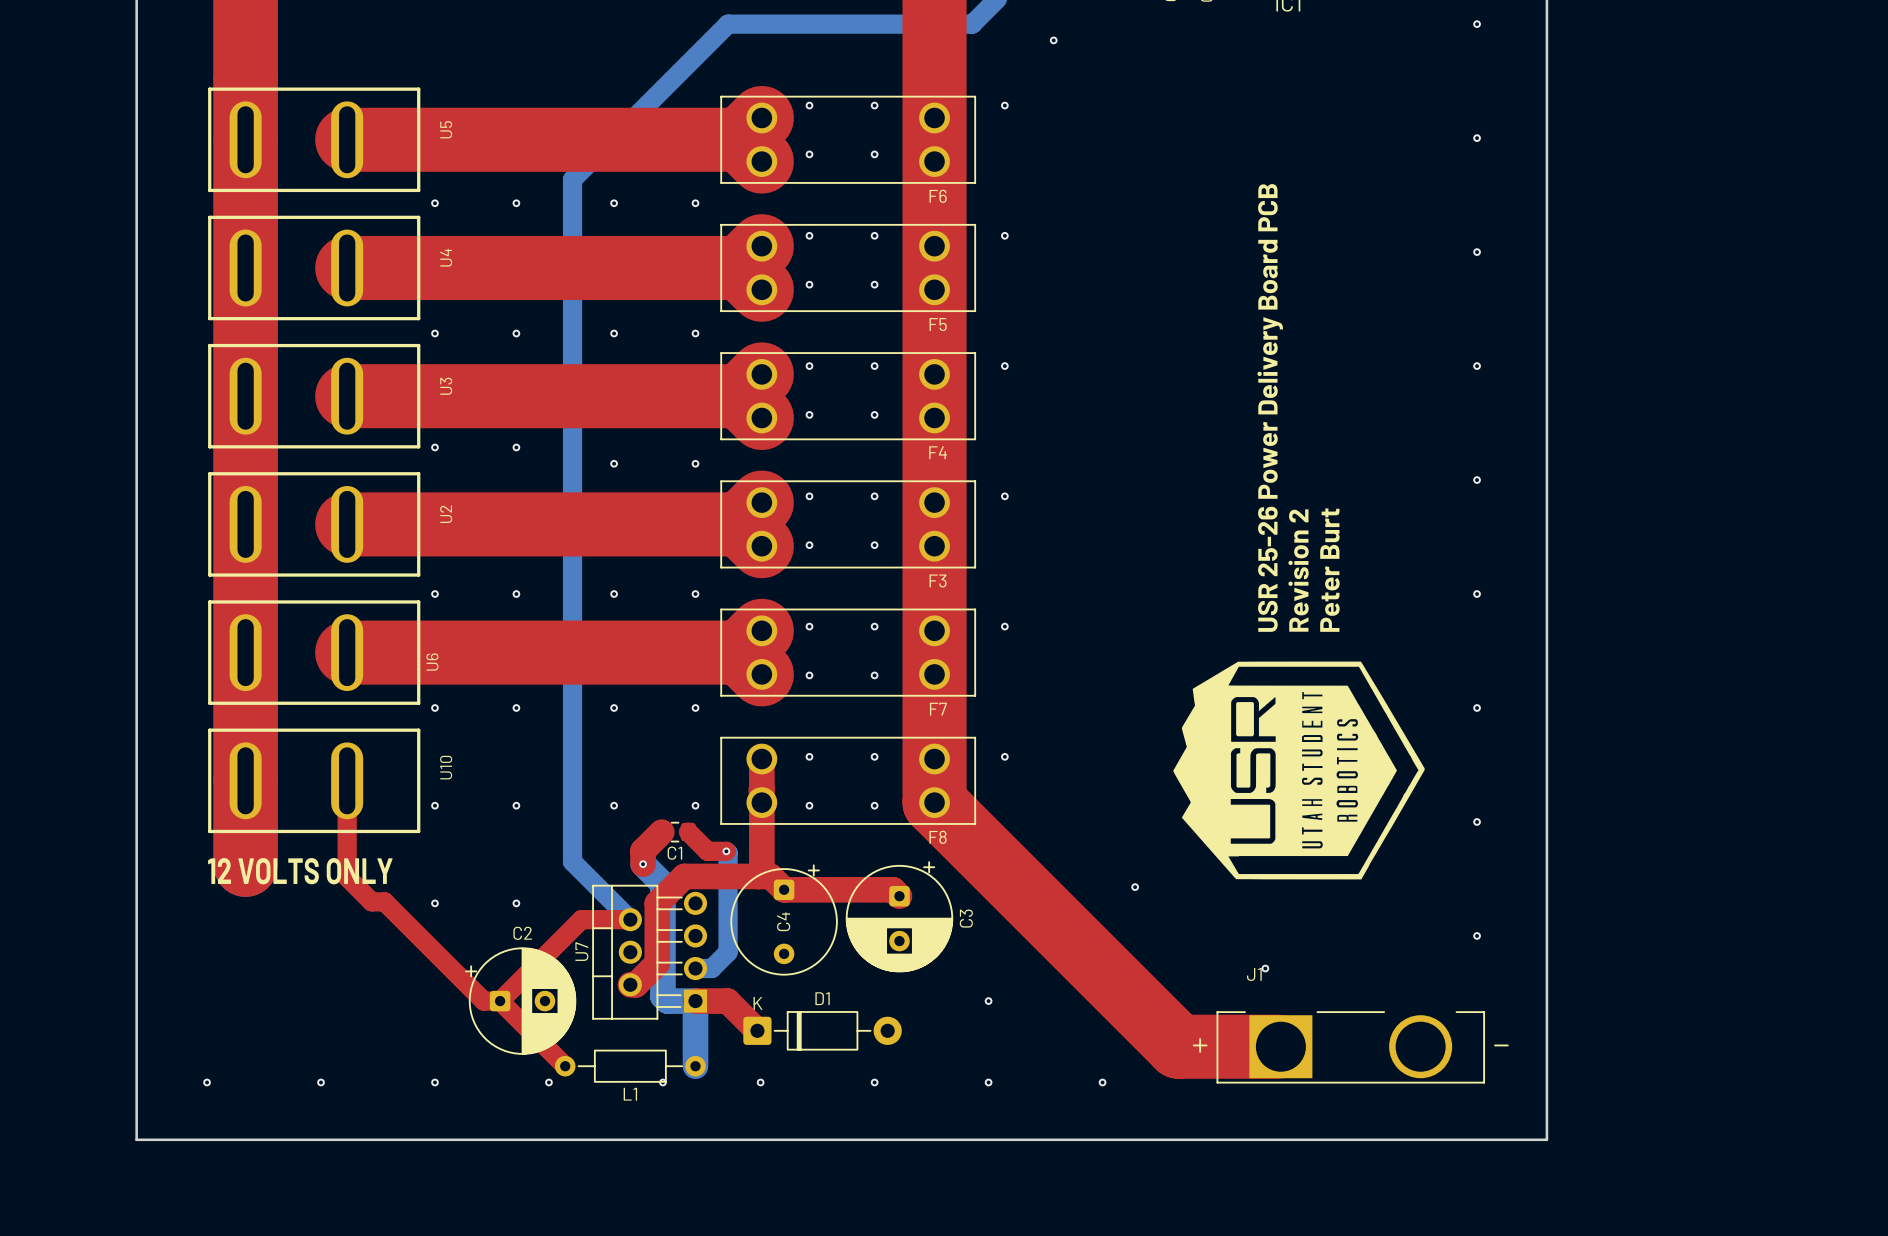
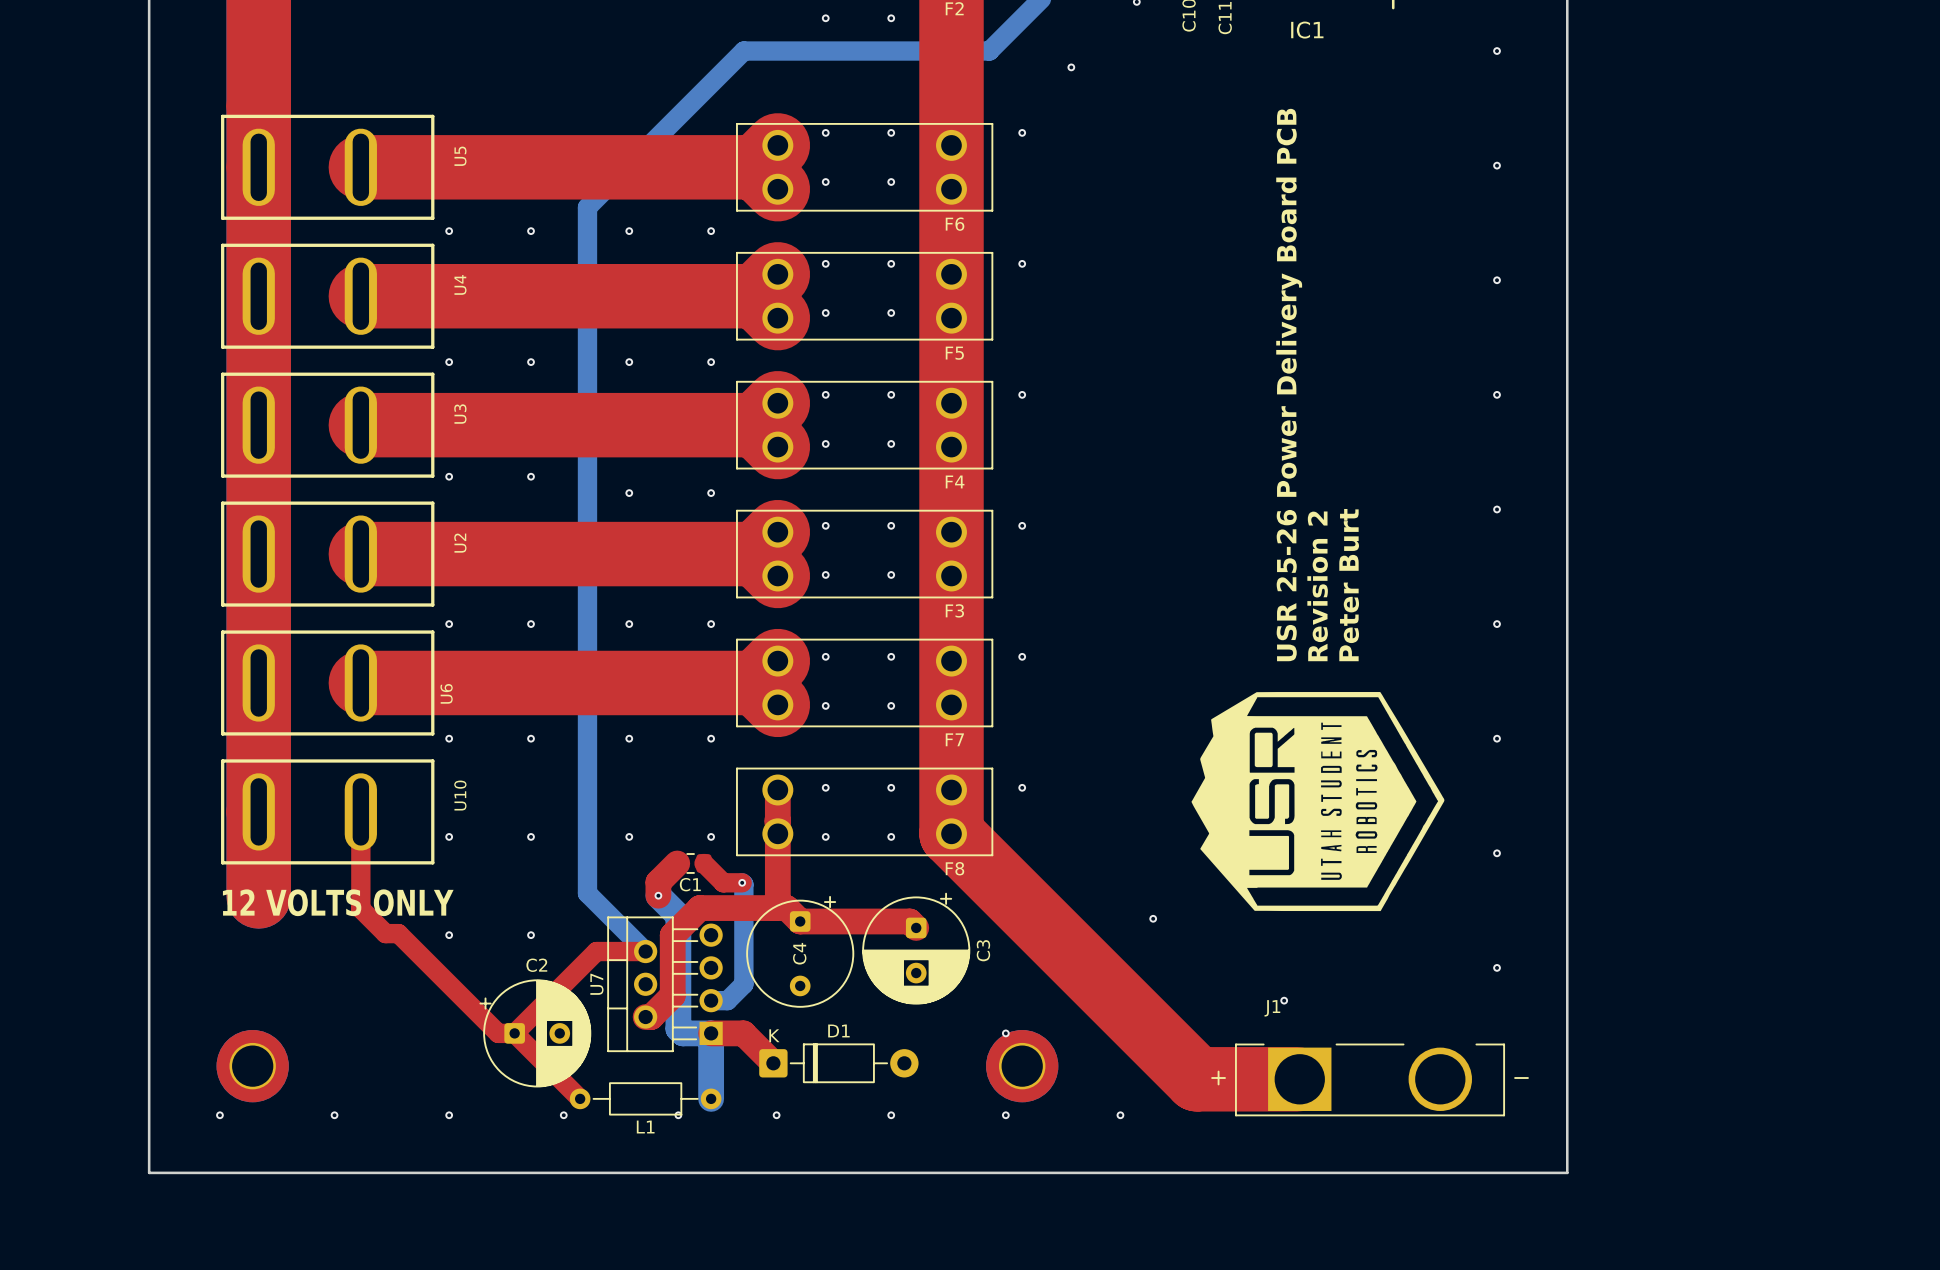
part: none -> (252, 1066)
part: none -> (1022, 1066)

